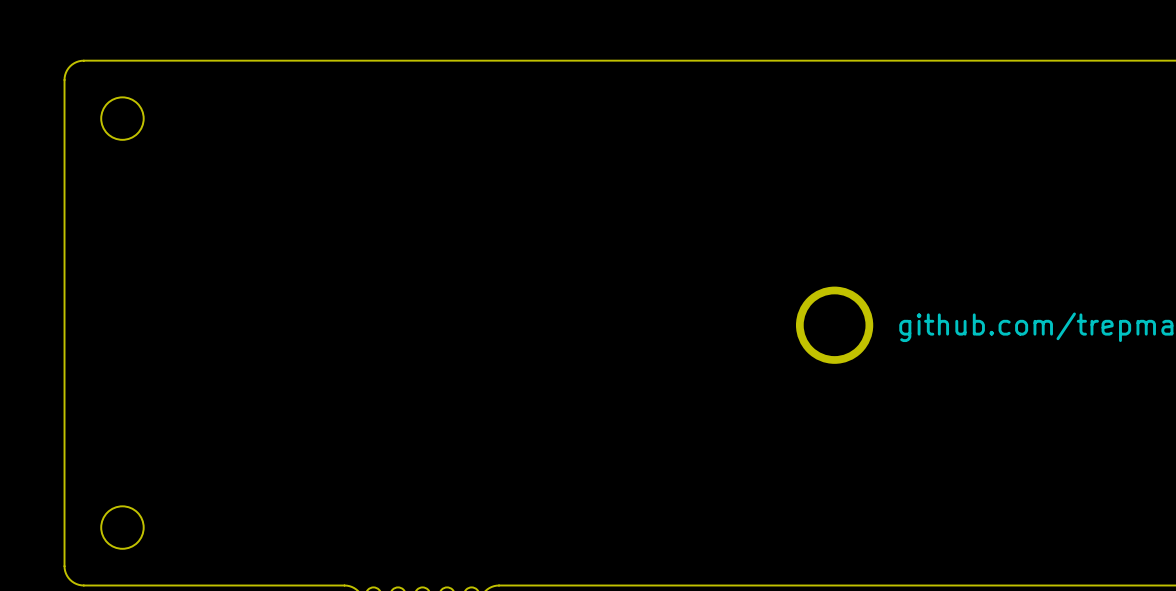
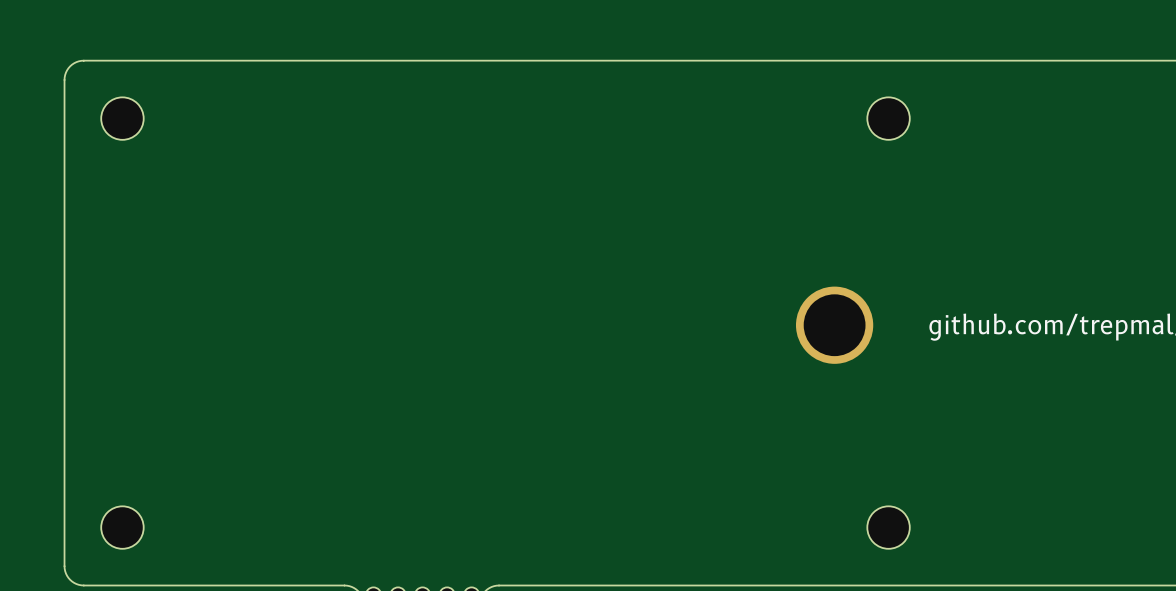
part: none -> (888, 118)
part: none -> (888, 527)

